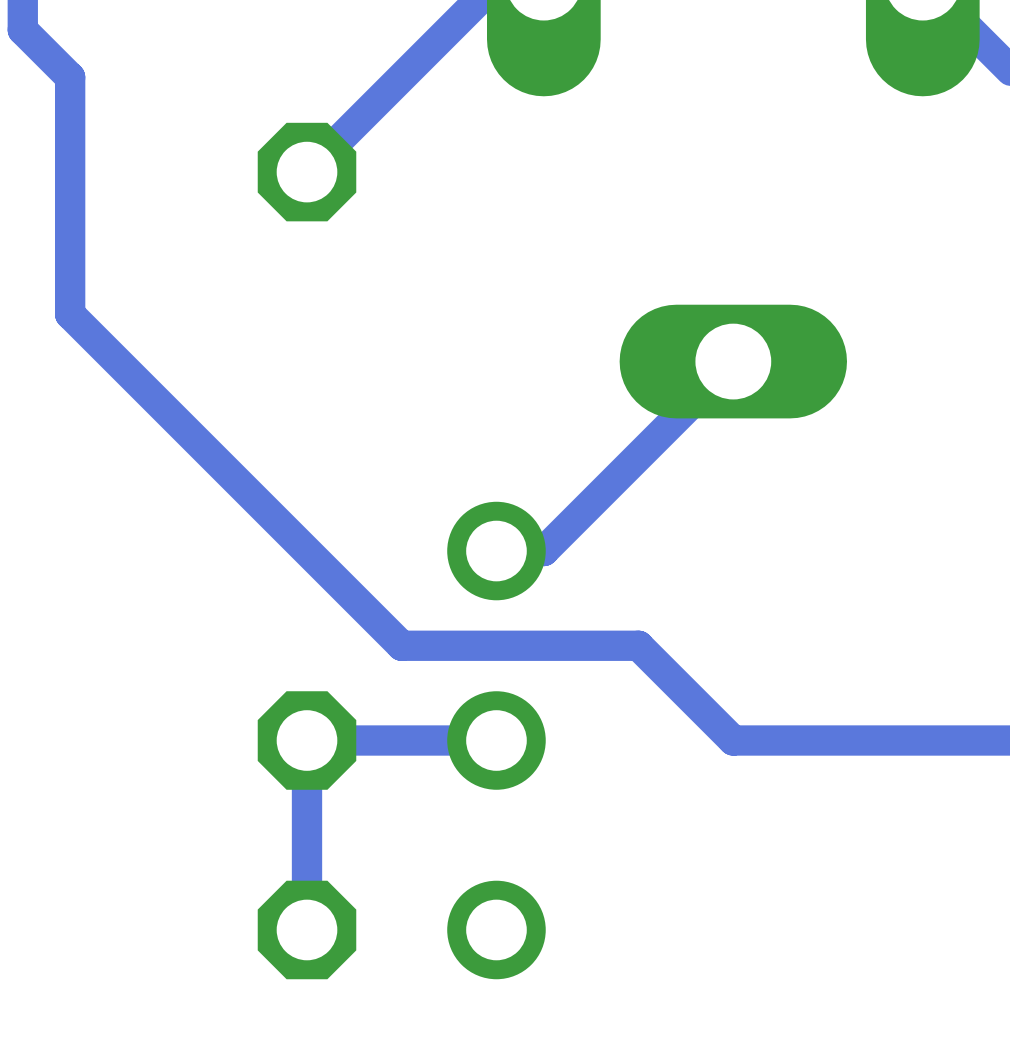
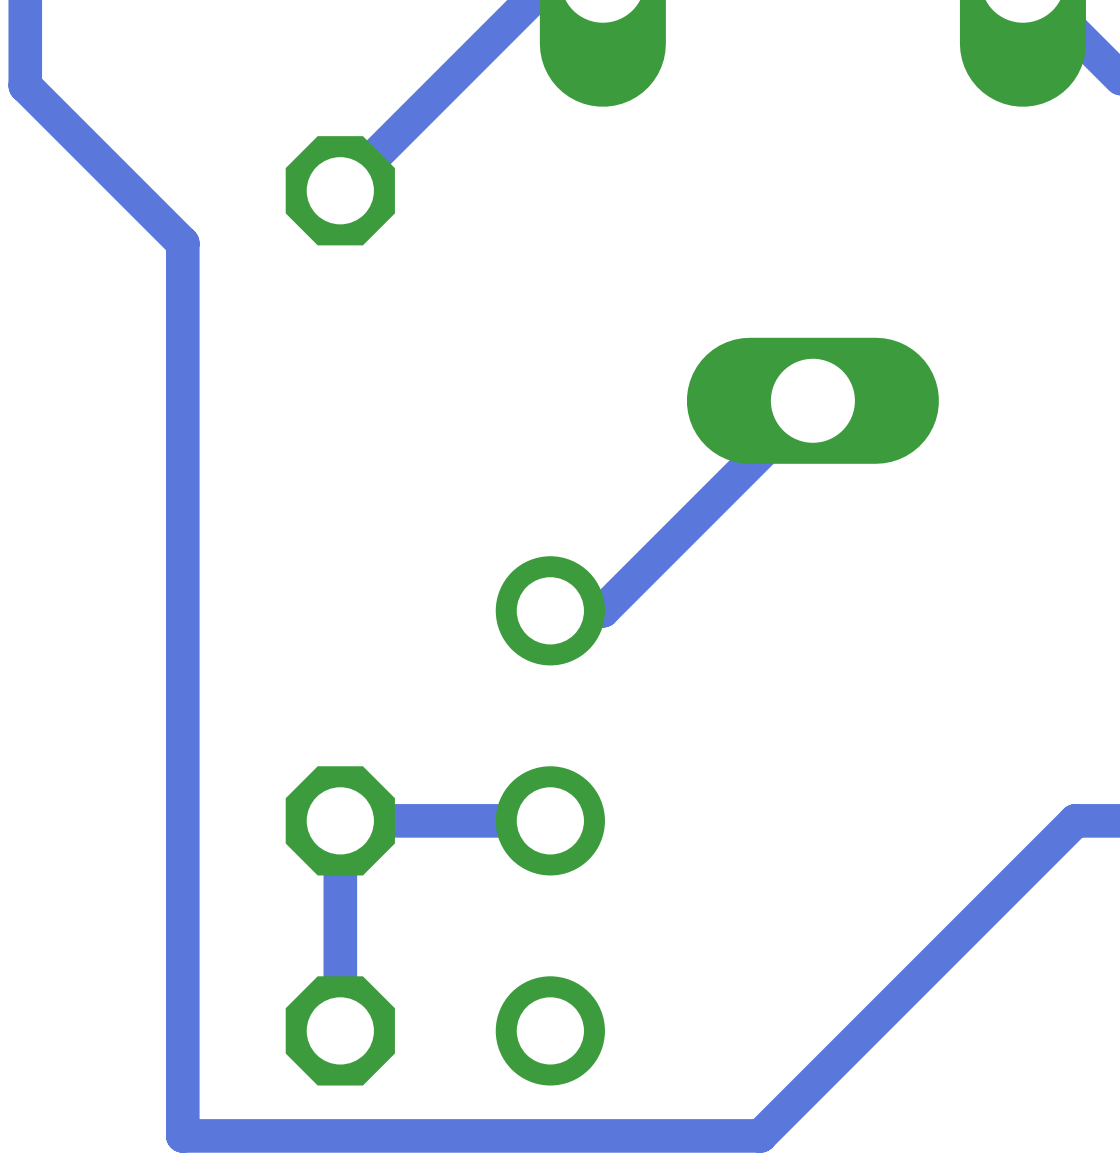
bottom track: (22, 29) (70, 77) (70, 314) (401, 645) (638, 645) (733, 740) (970, 740) -> (25, 33) (25, 85) (182, 243) (182, 1135) (760, 1135) (1075, 820)

